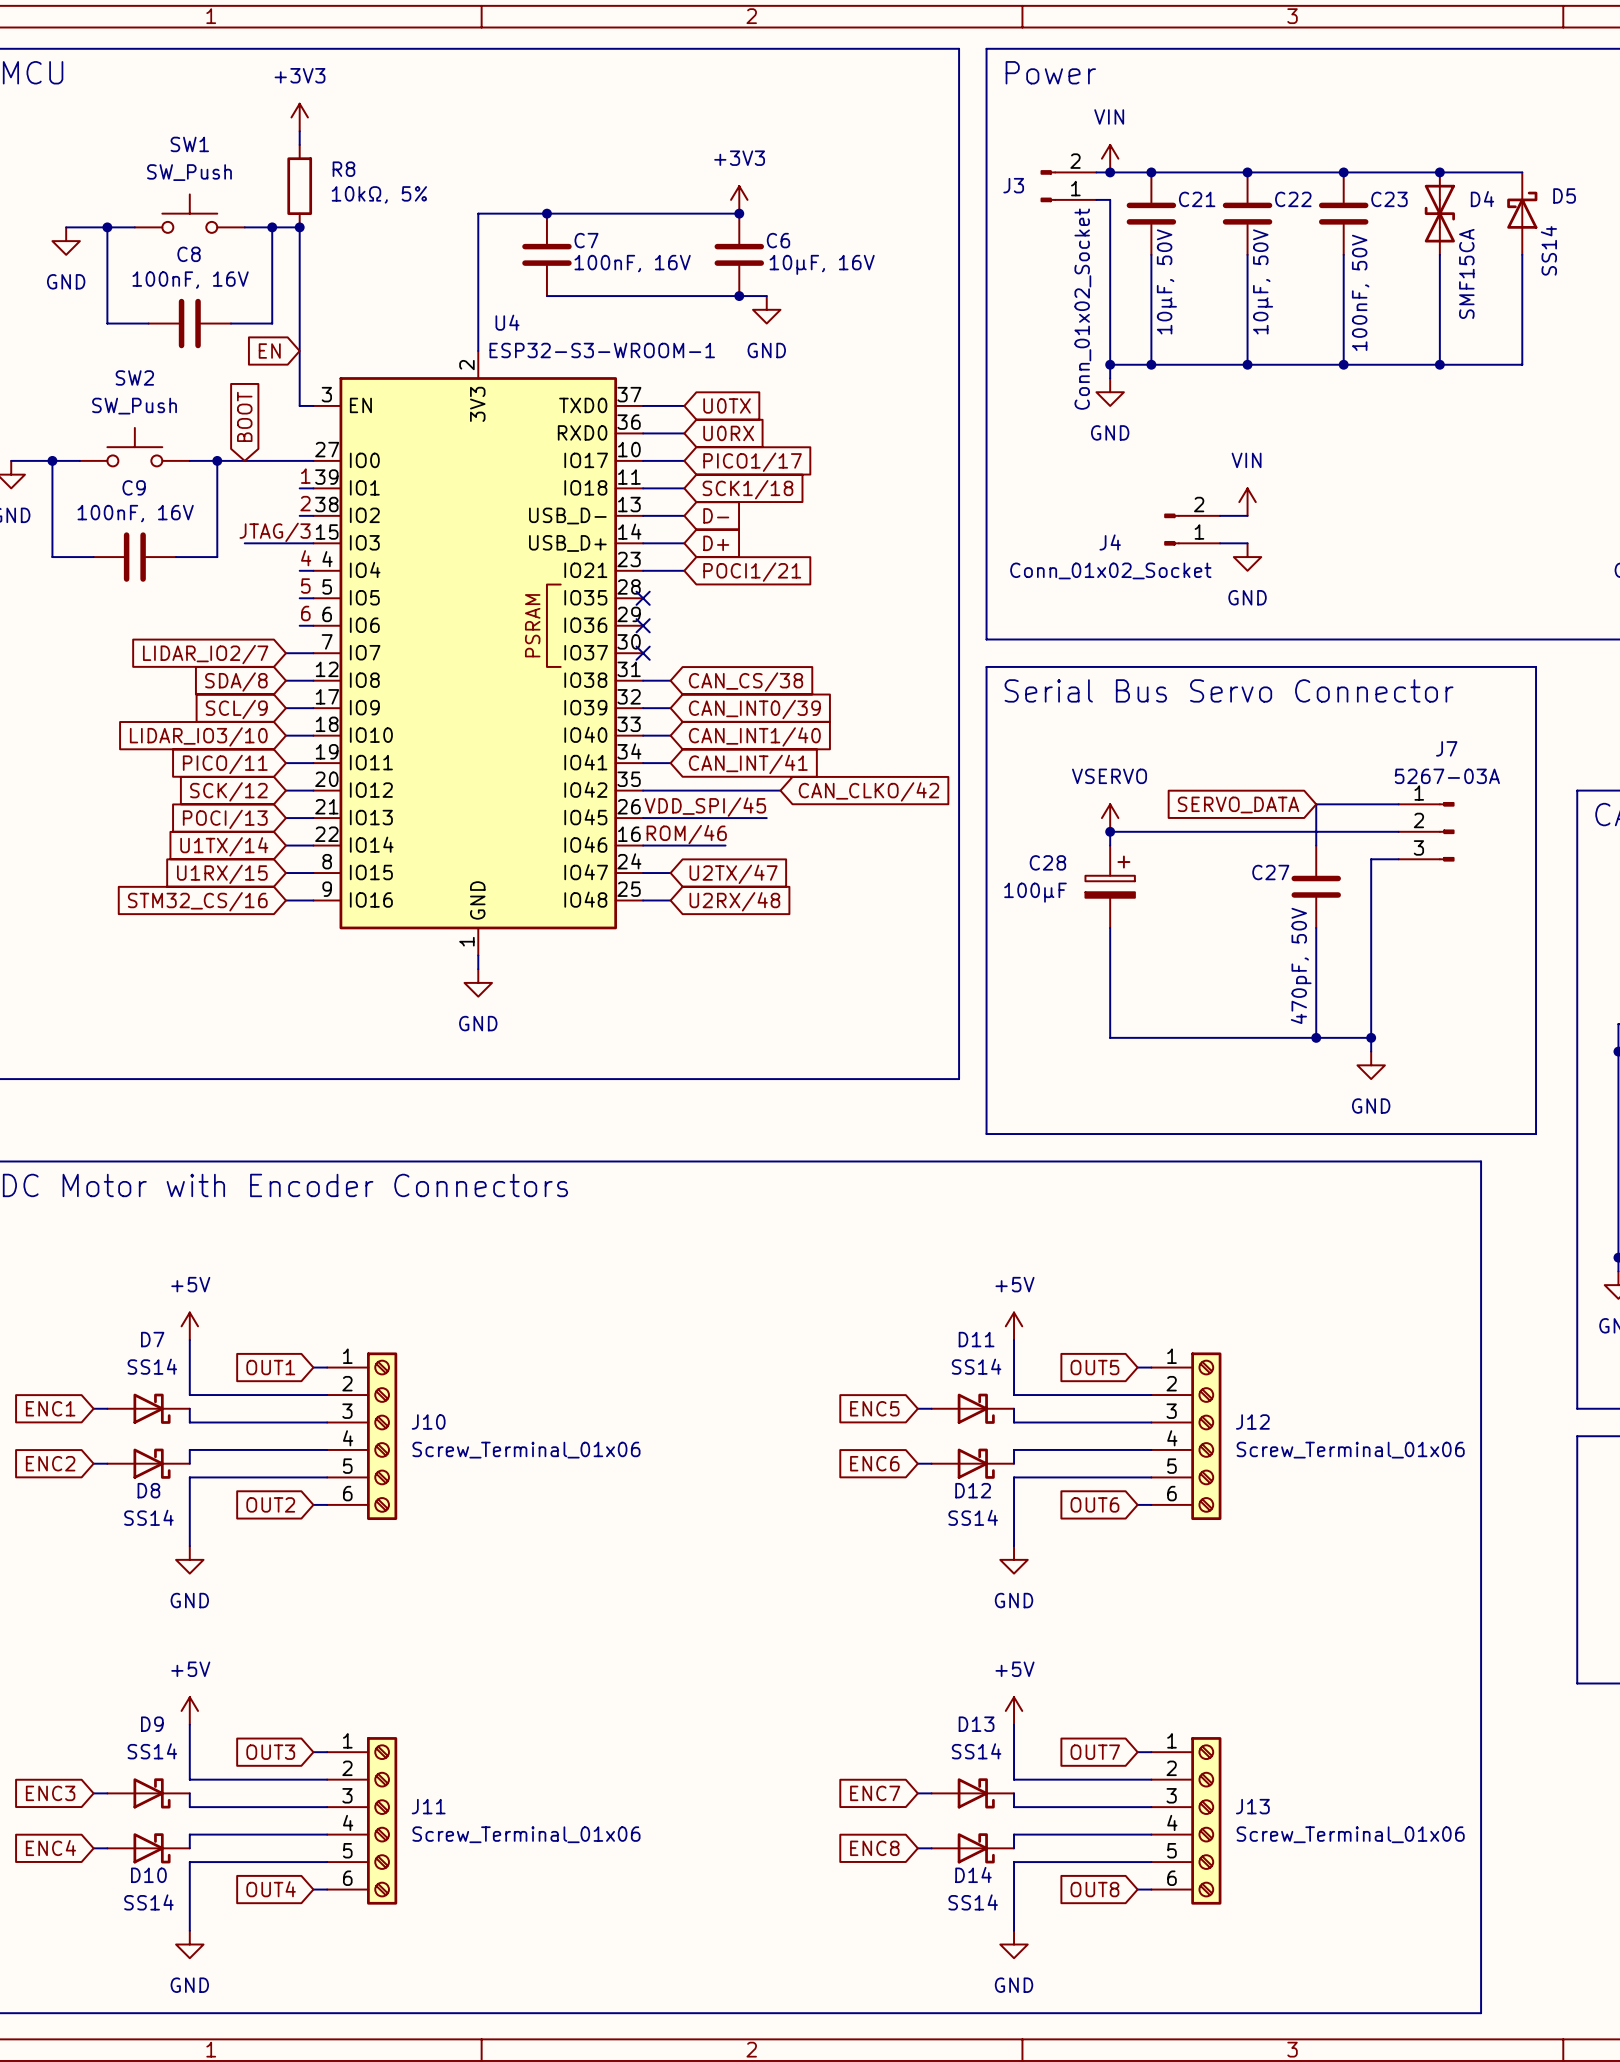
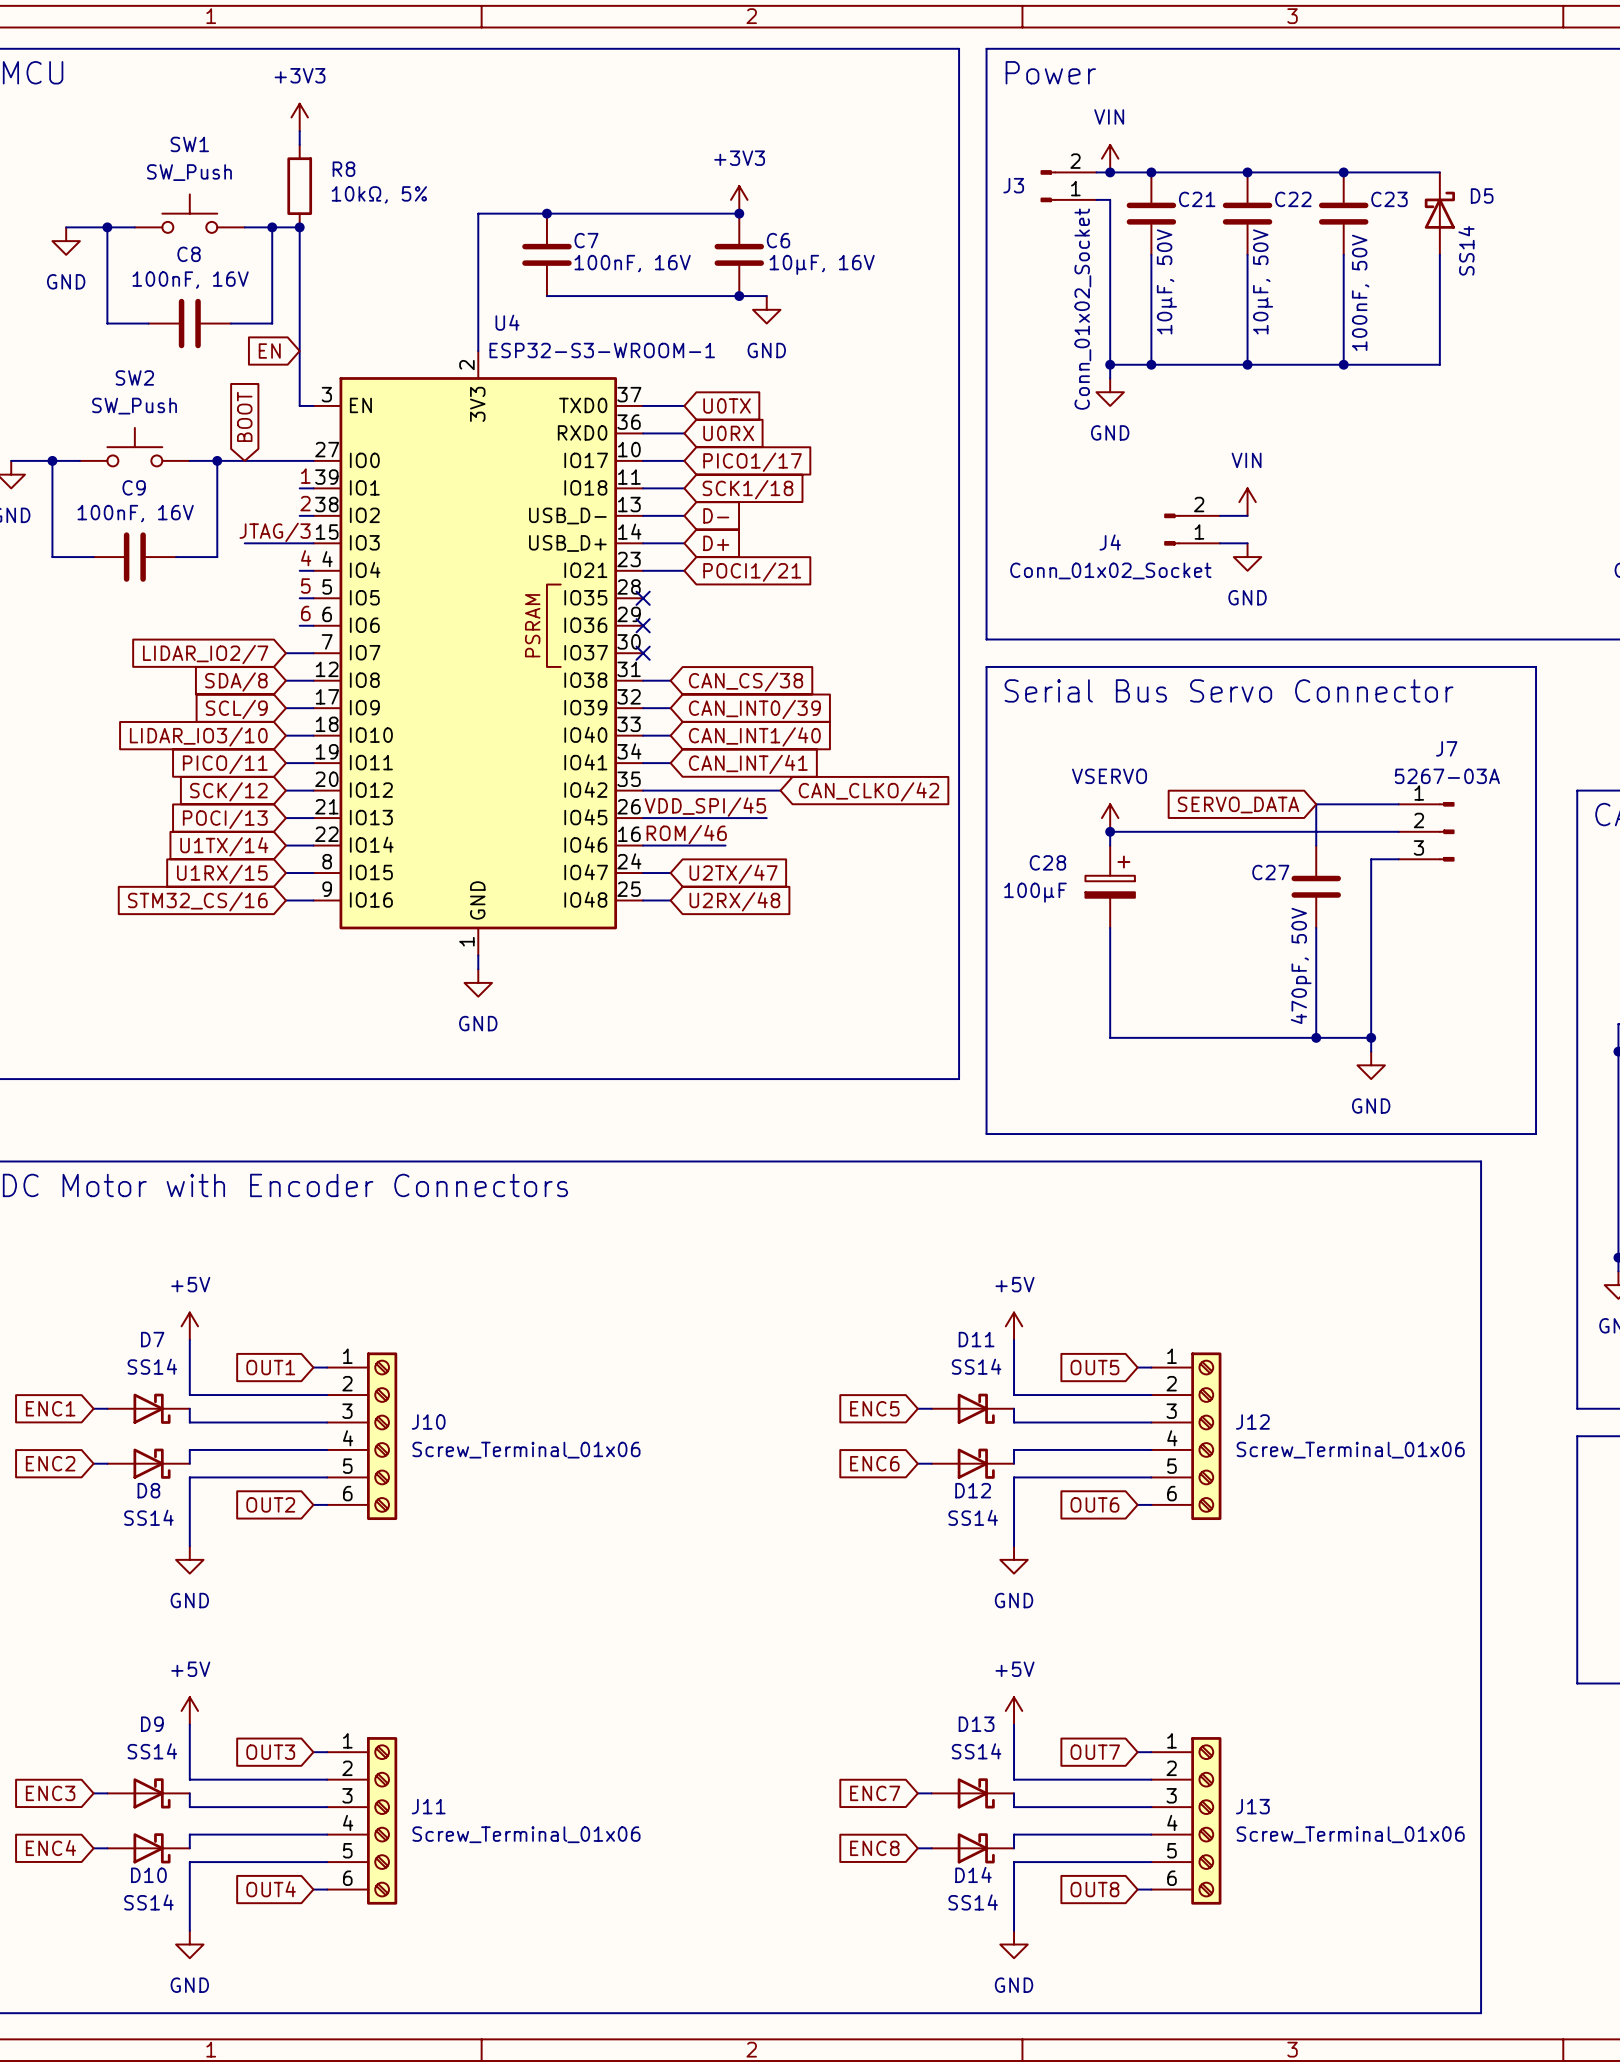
wire: (1439, 172) (1522, 172) -> none
junction: (1439, 172) -> none
D4: SMF15CA (1439, 213) -> none
D5 position: (1522, 213) -> (1439, 213)
wire: (1522, 254) (1522, 364) (1439, 364) -> none
junction: (1439, 364) -> none

